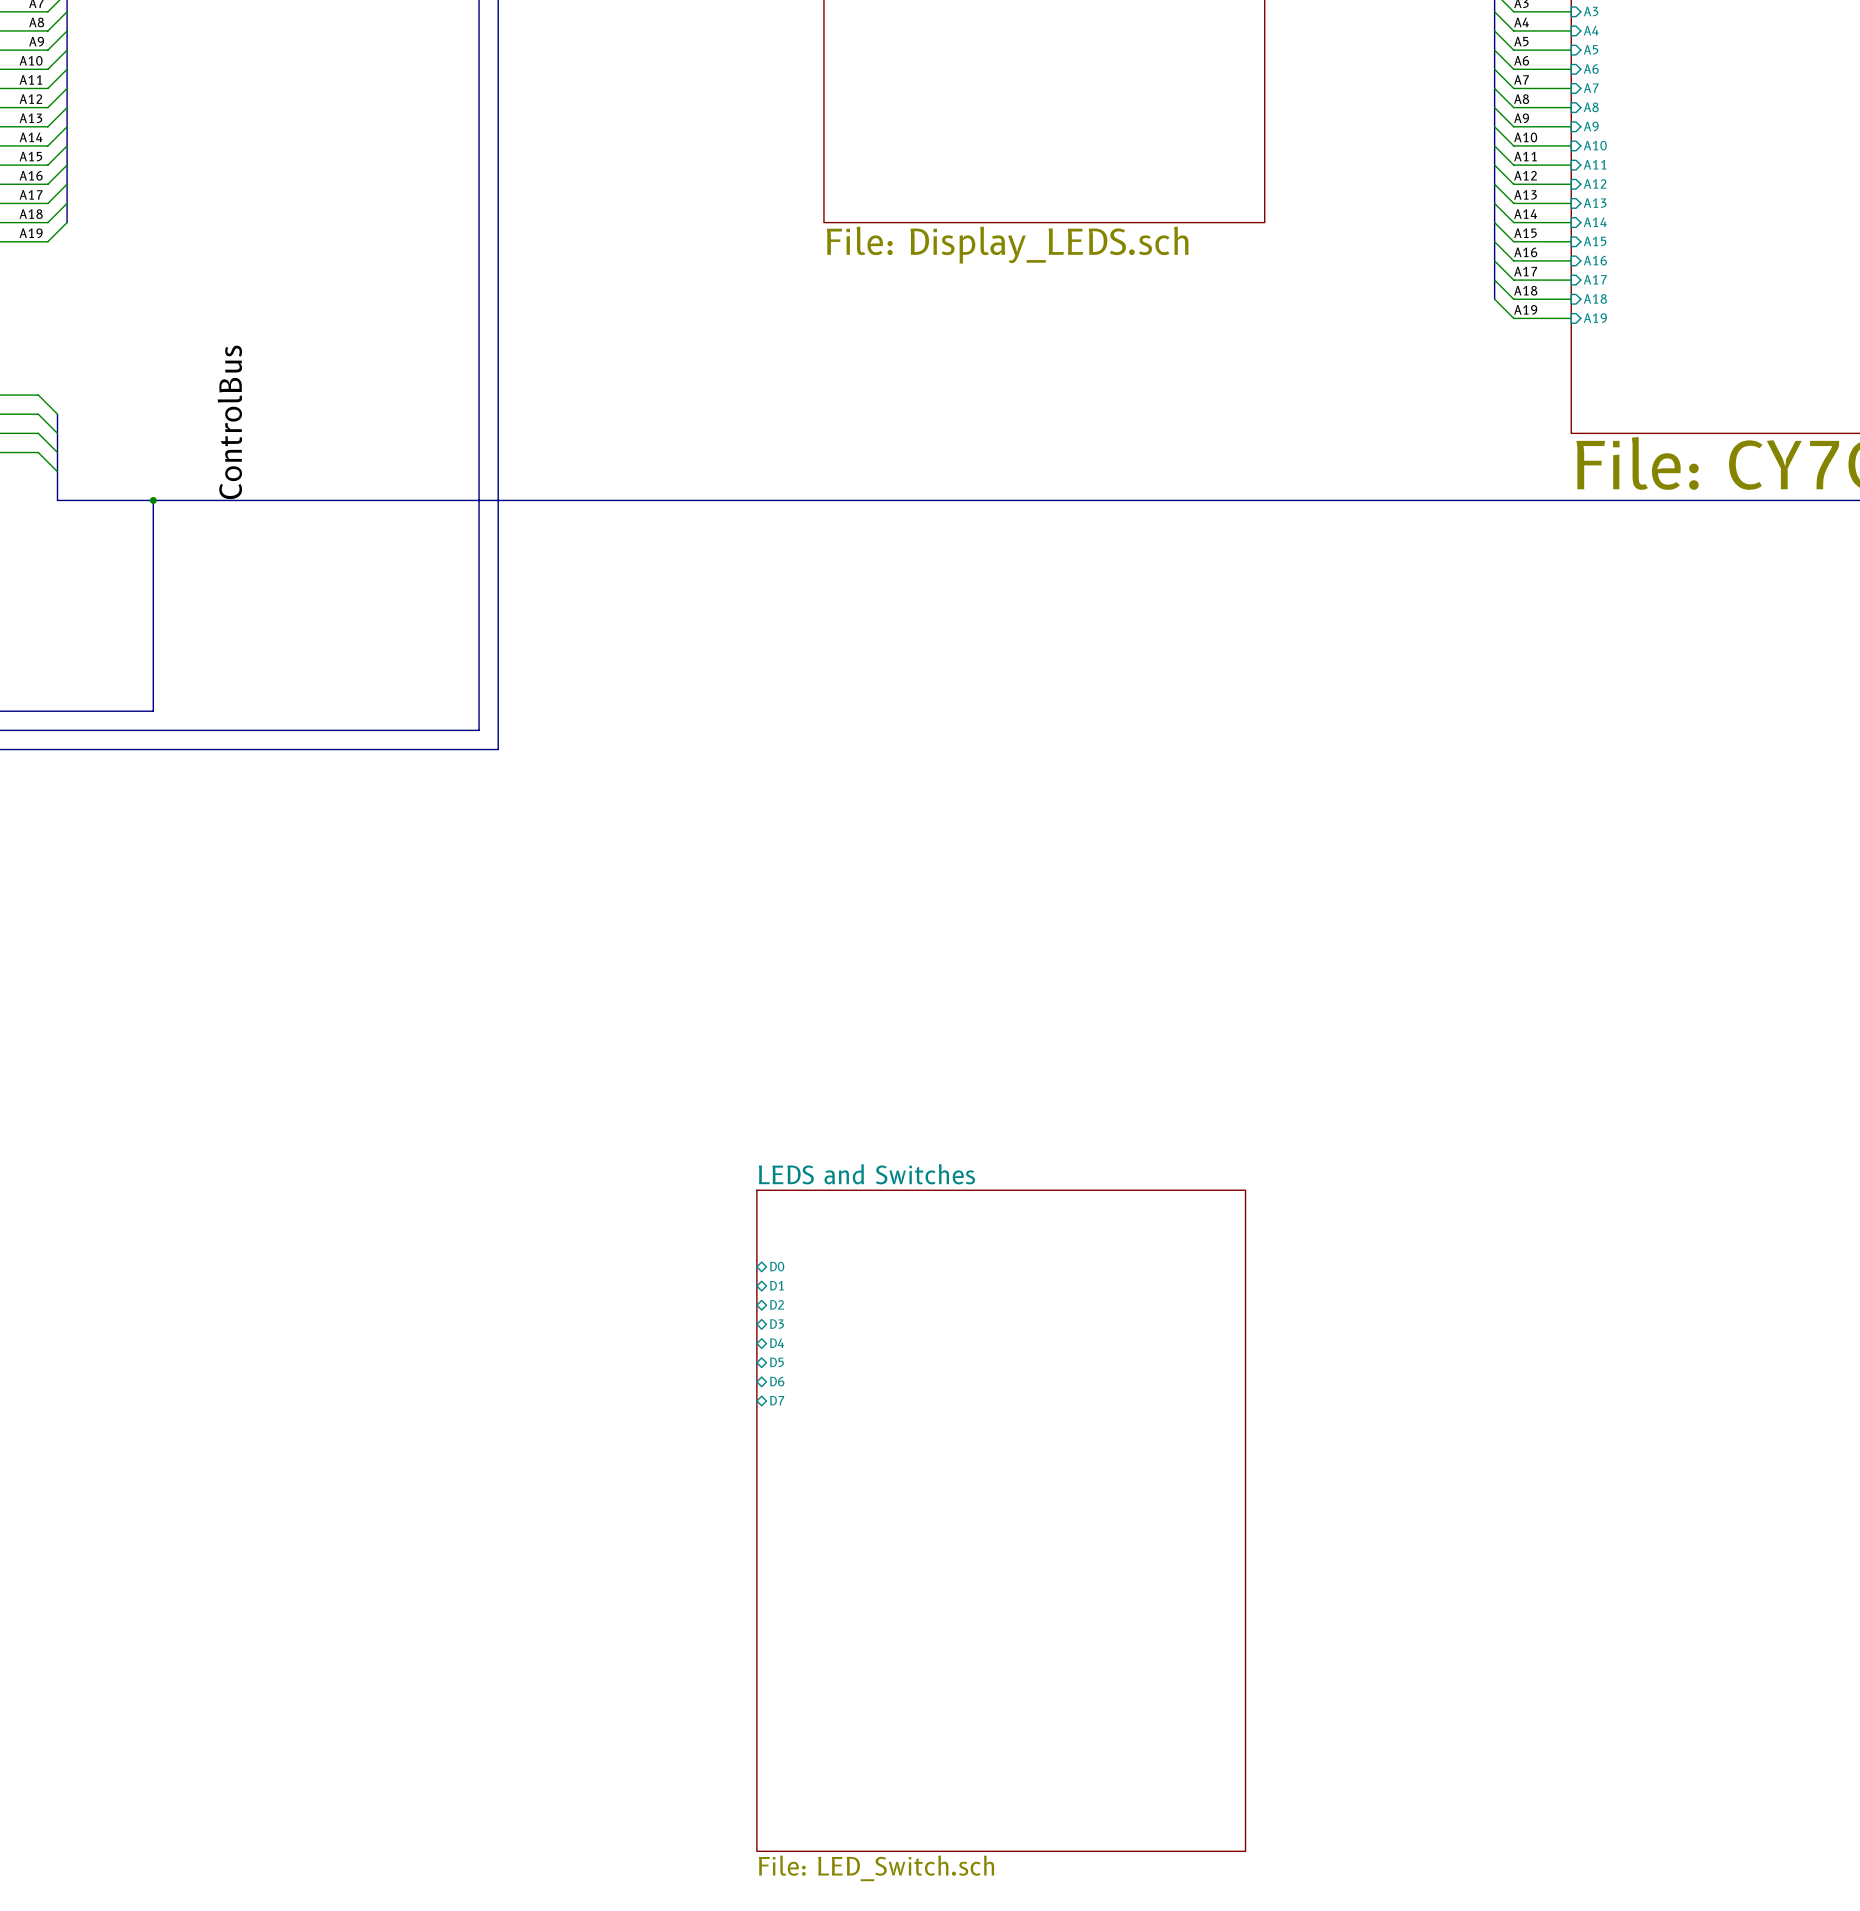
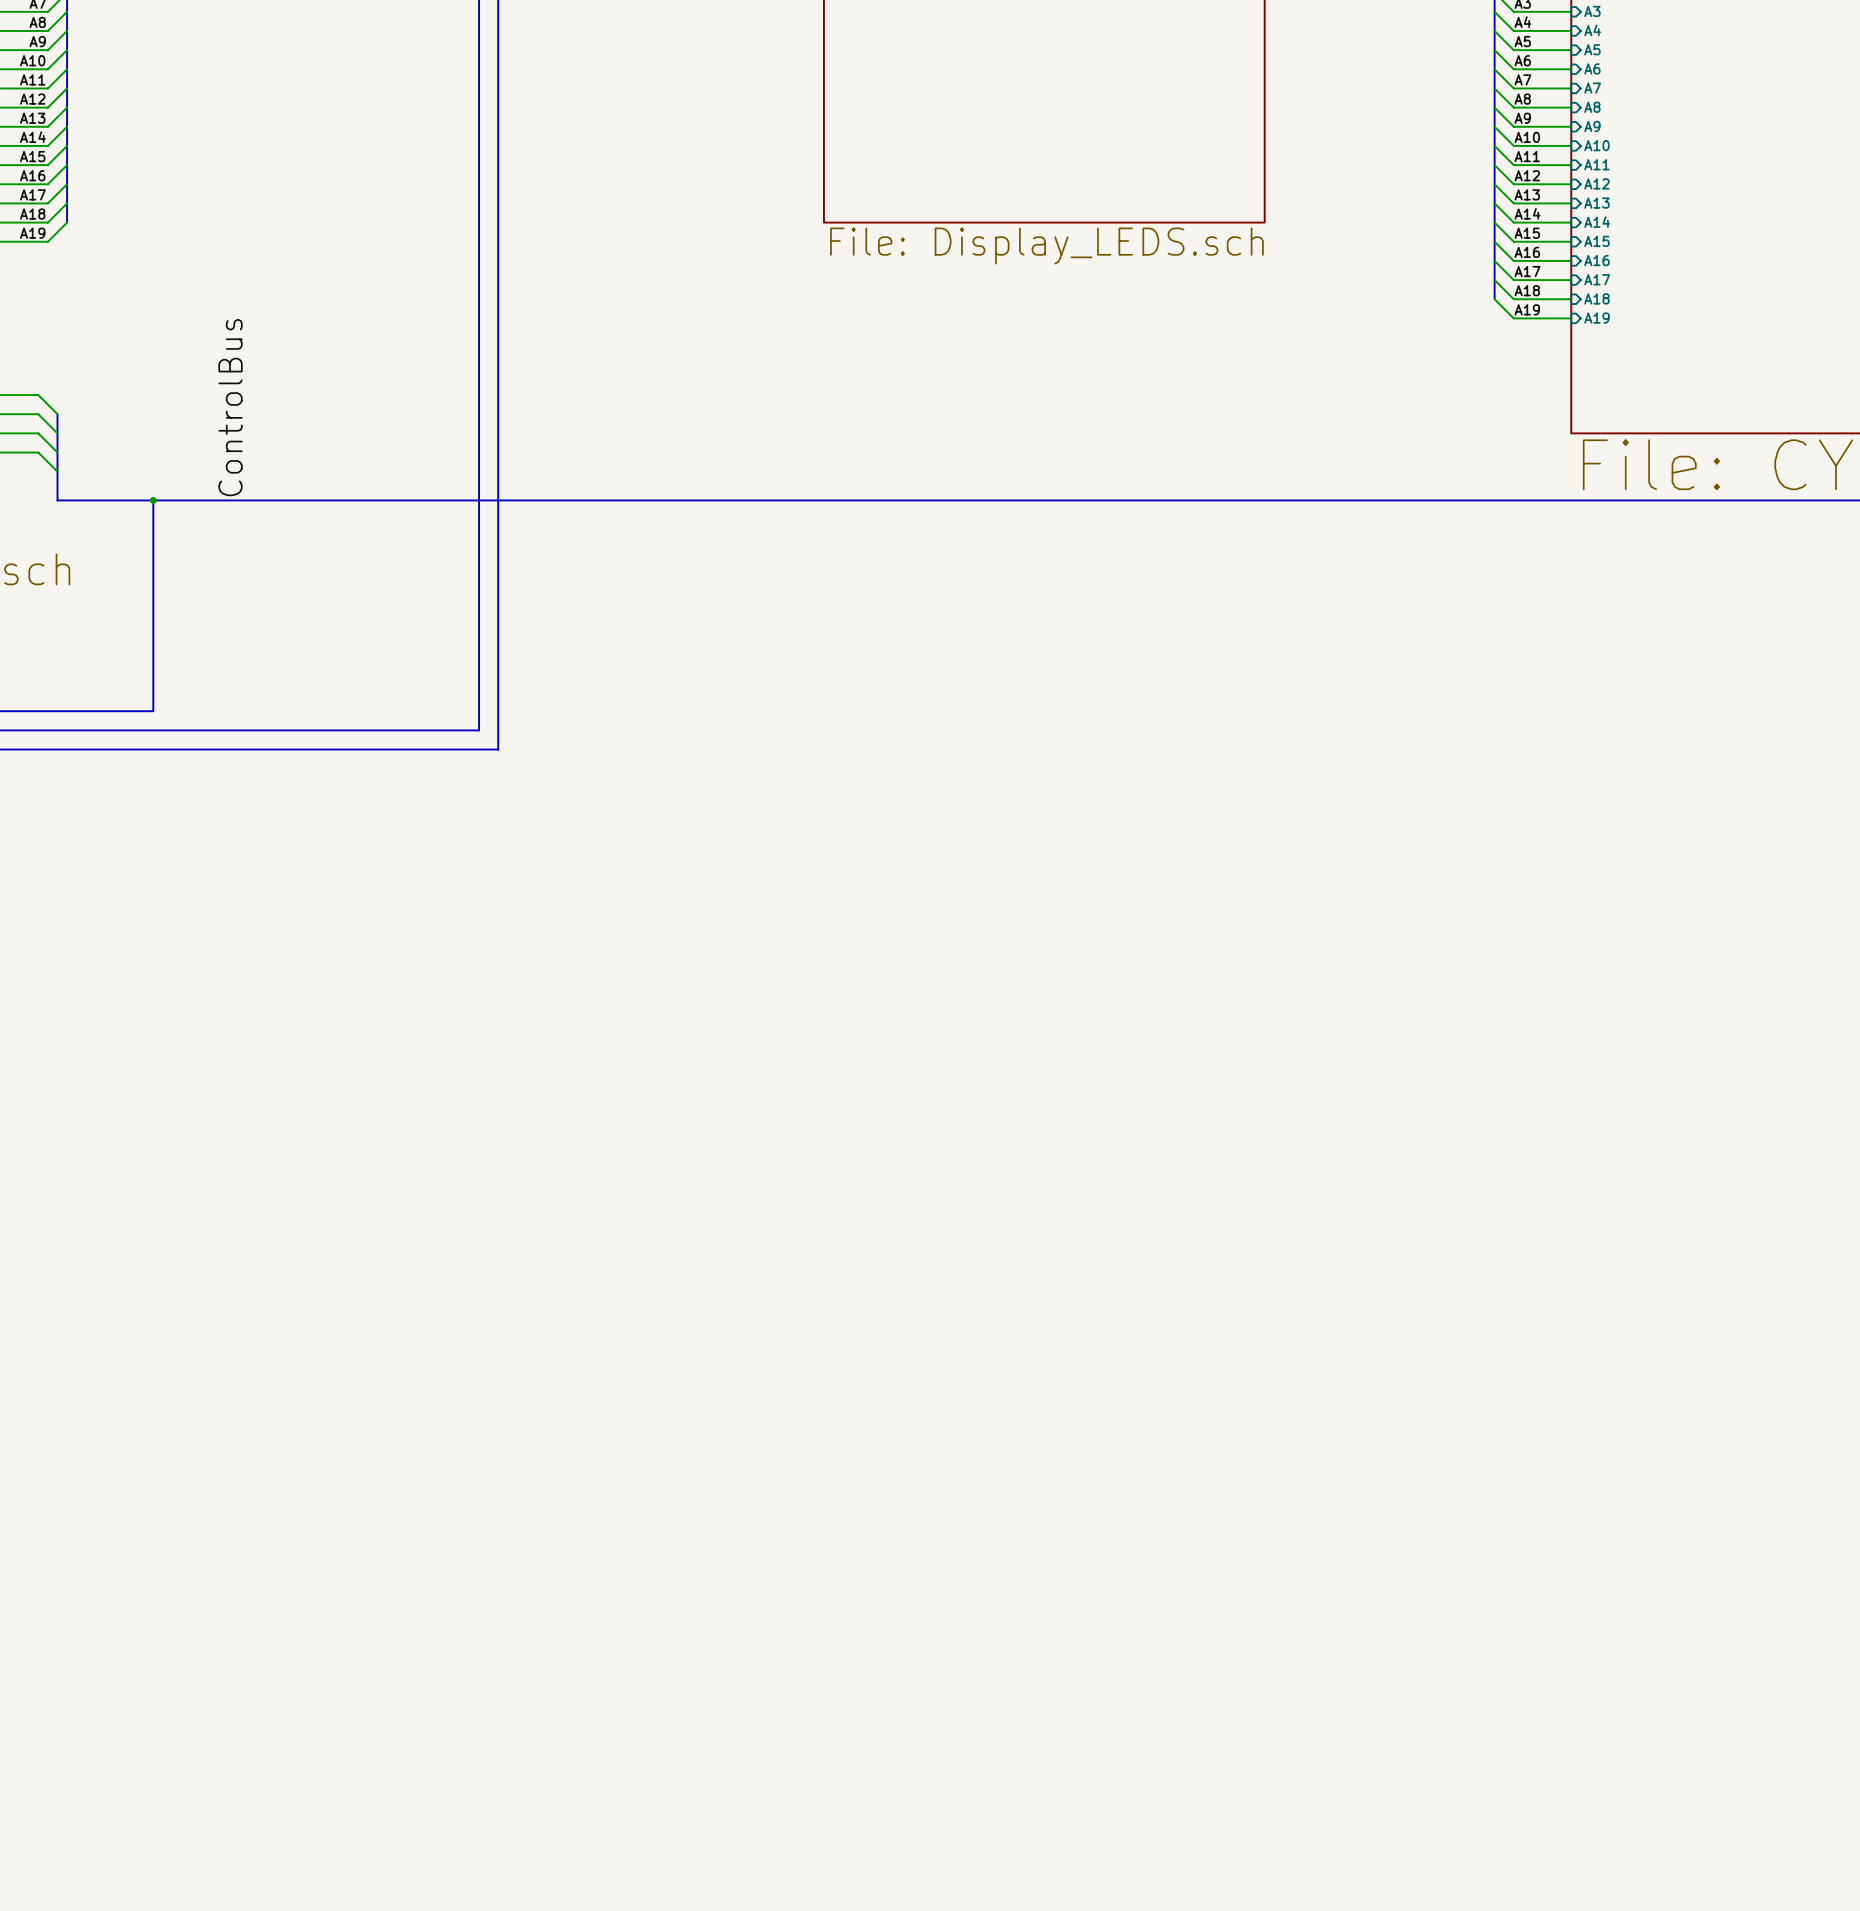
sheet pin: D0 (777, 1266) -> none
sheet pin: D1 (777, 1285) -> none
sheet pin: D2 (777, 1304) -> none
sheet pin: D3 (777, 1324) -> none
sheet pin: D4 (777, 1343) -> none
sheet pin: D5 (777, 1362) -> none
sheet pin: D6 (777, 1381) -> none
sheet pin: D7 (777, 1400) -> none
sheet LEDS and Switches: File: LED_Switch.sch (1001, 1520) -> none

